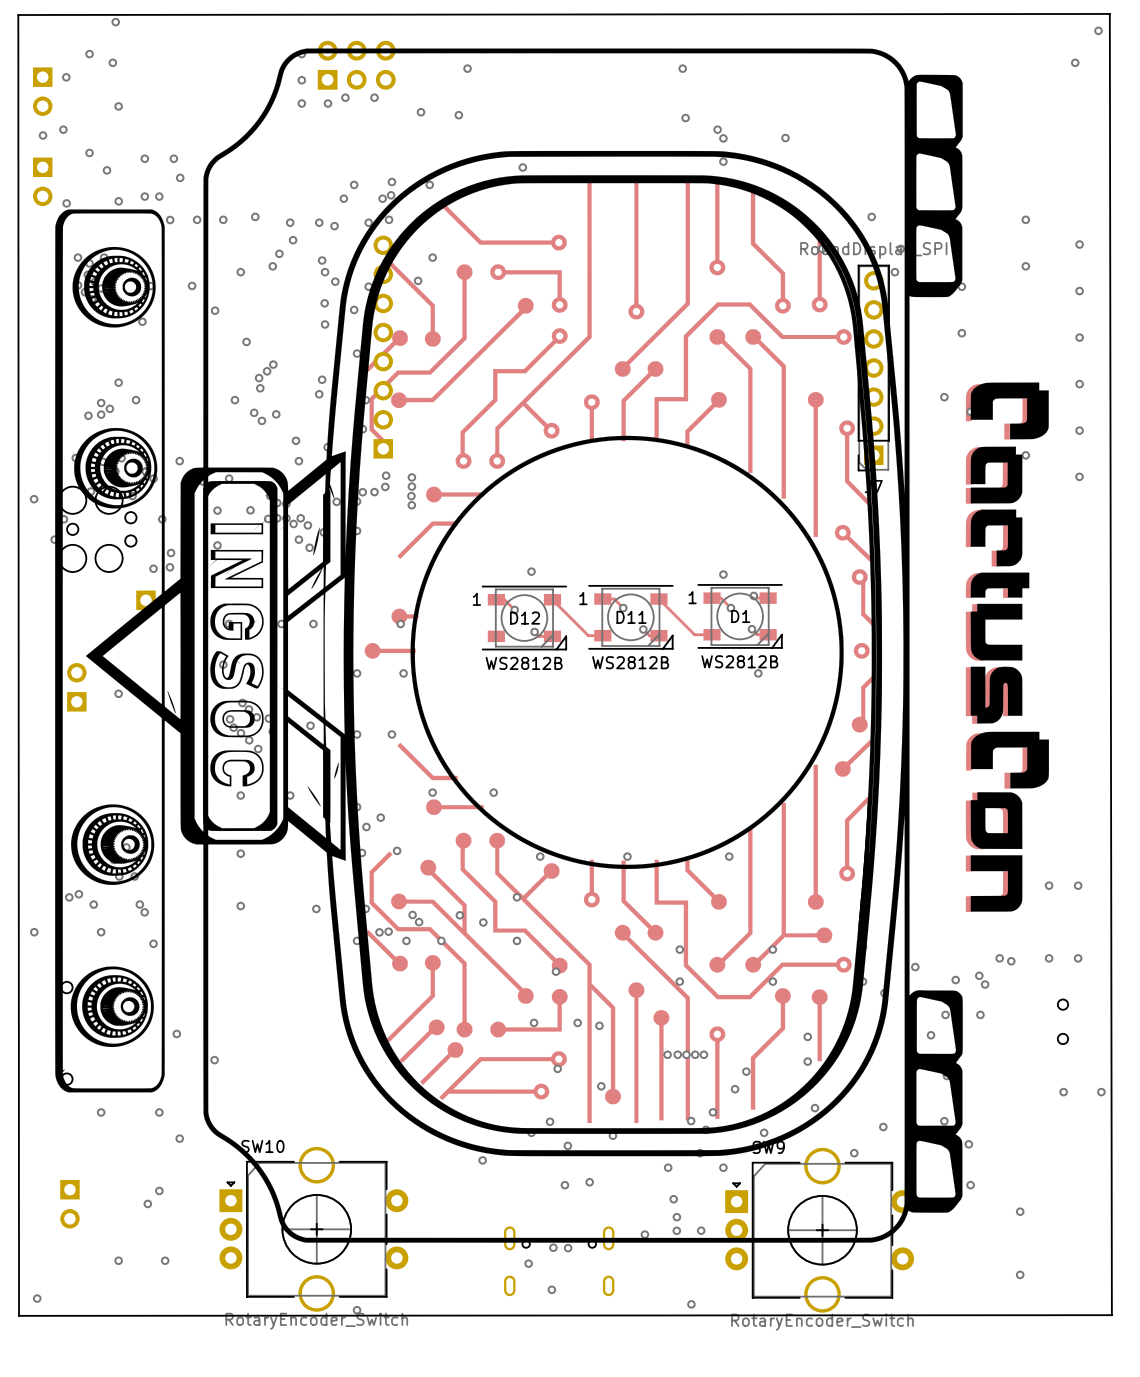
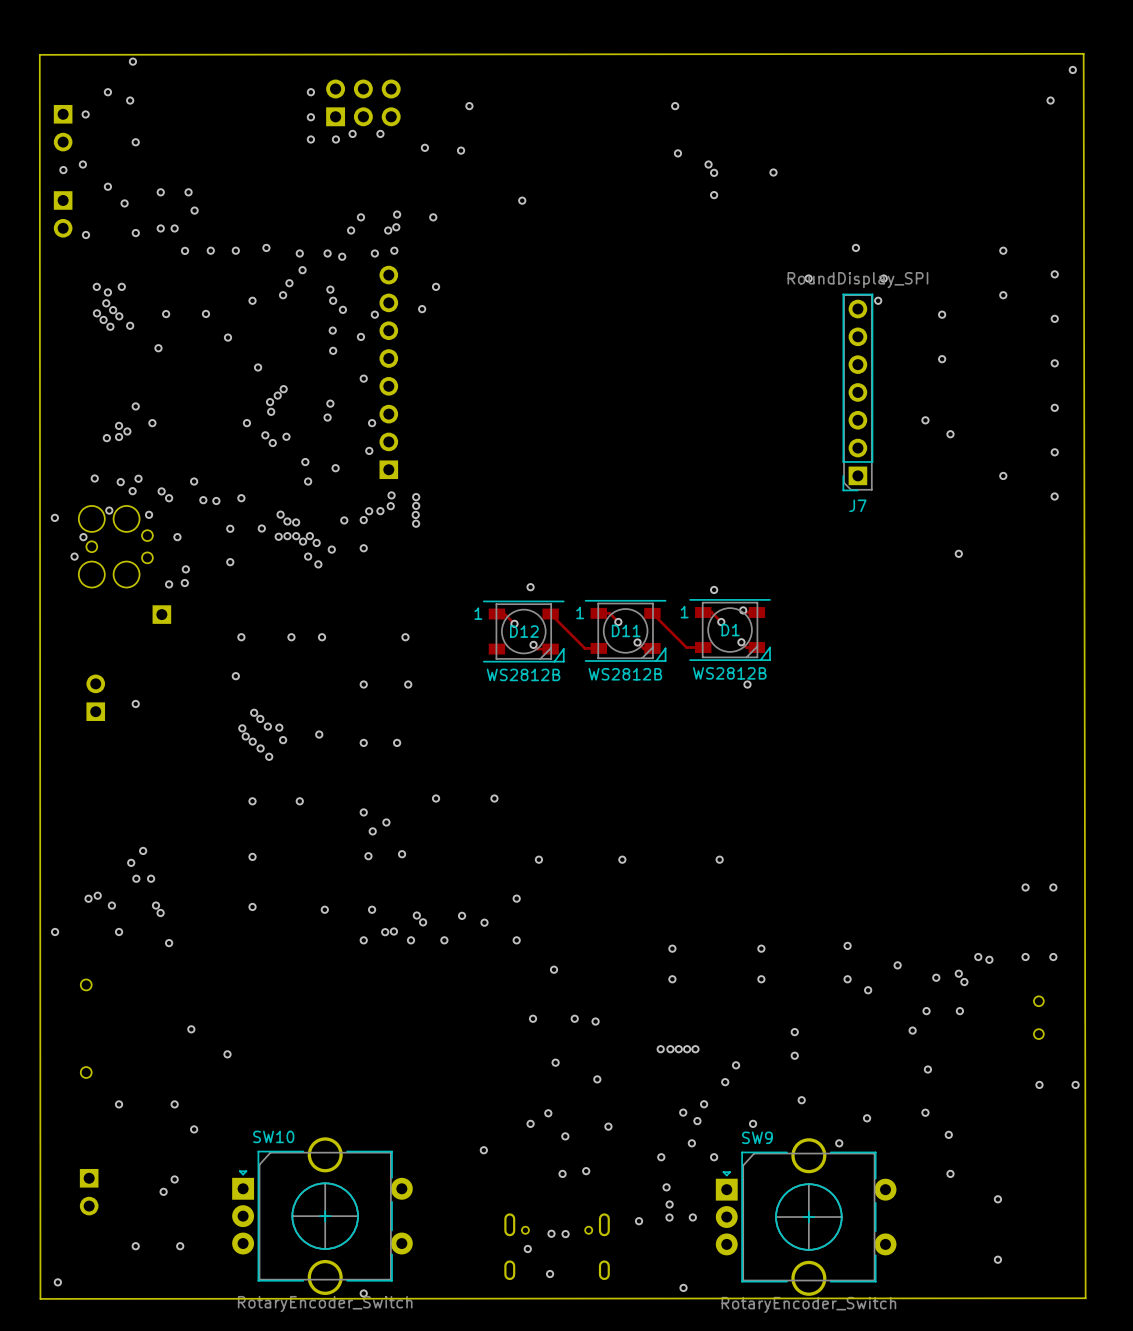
drawing: [55, 48, 1049, 1243] -> none

